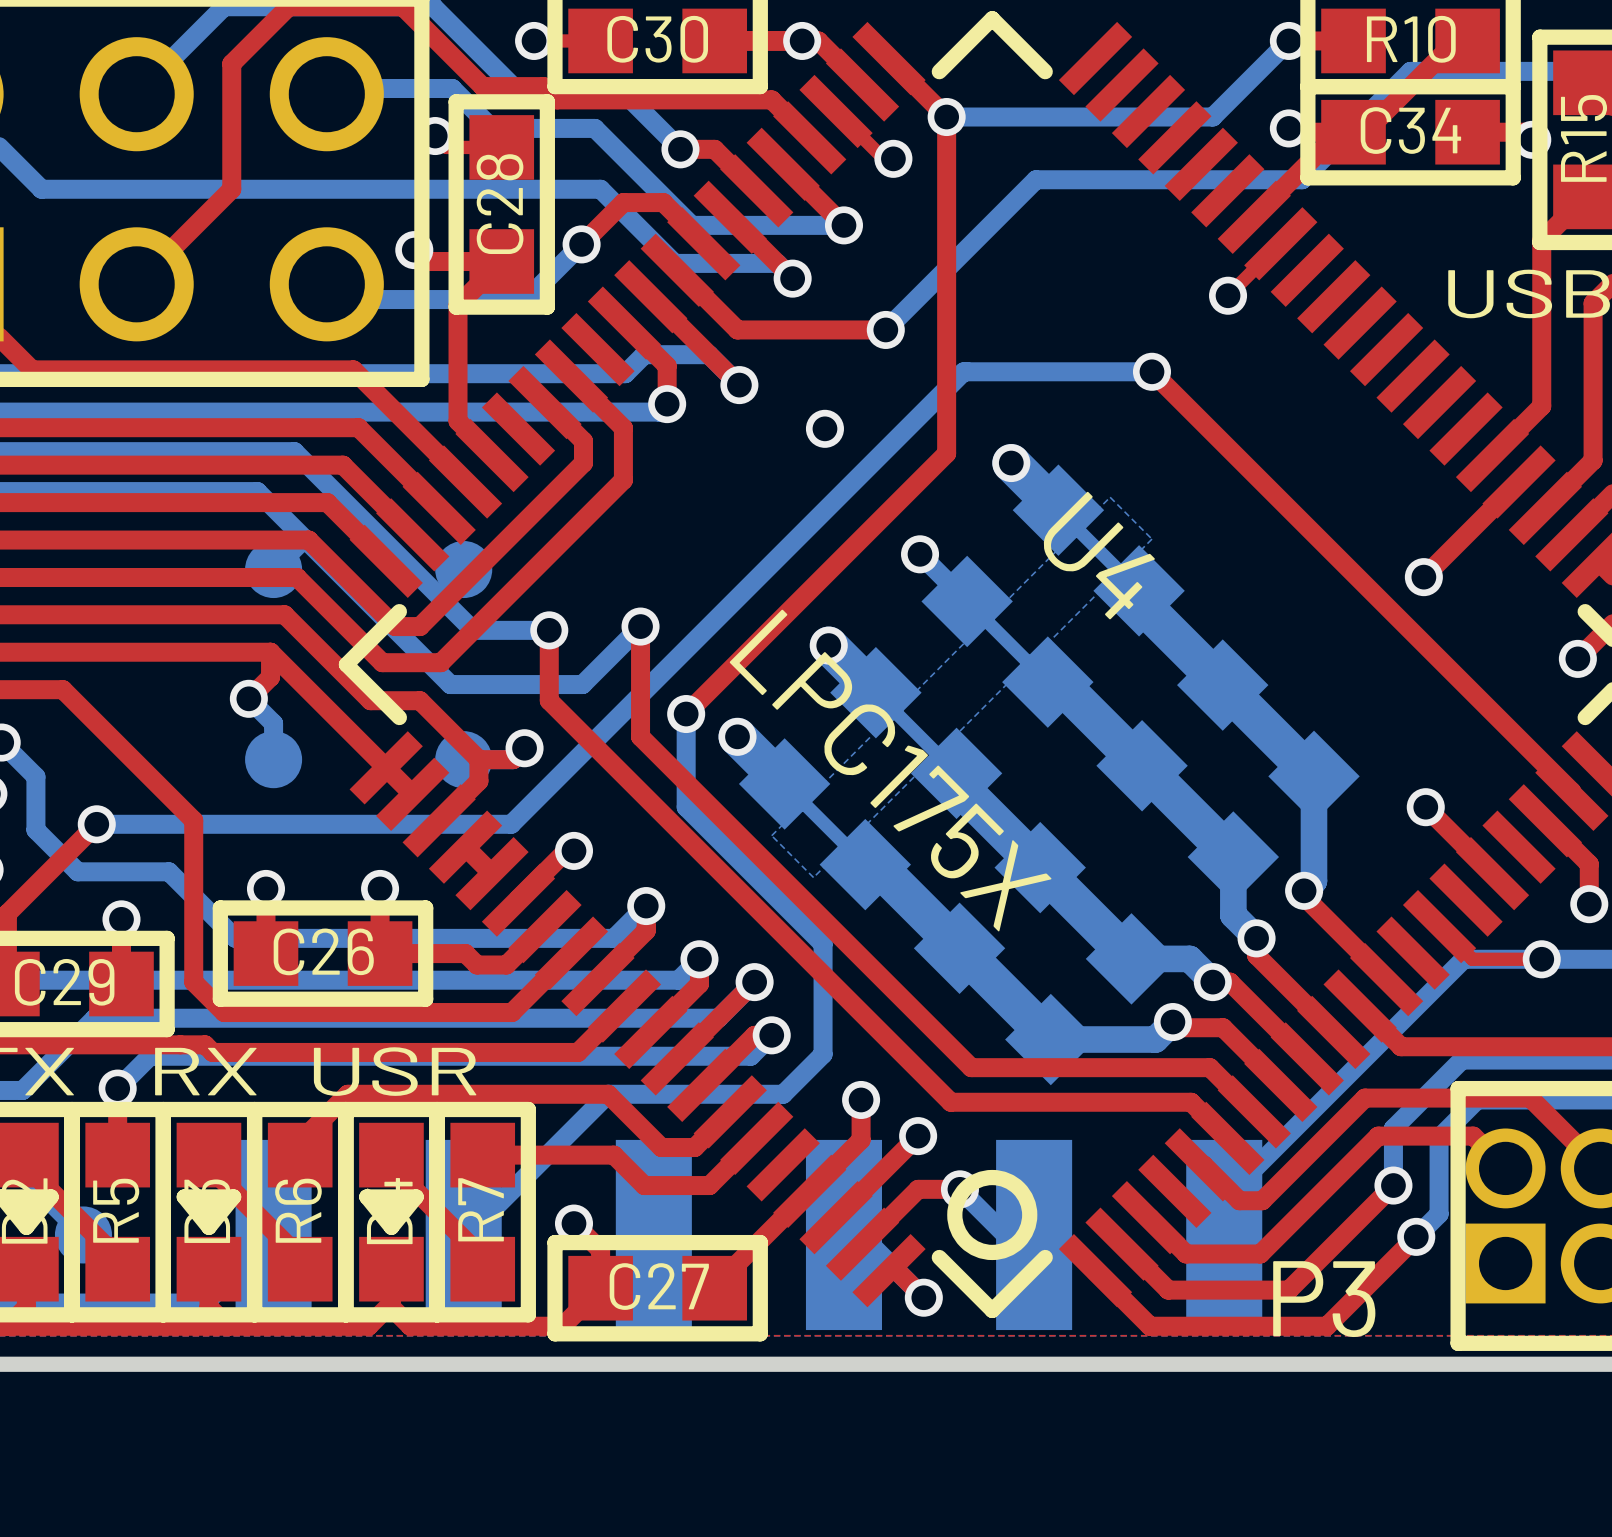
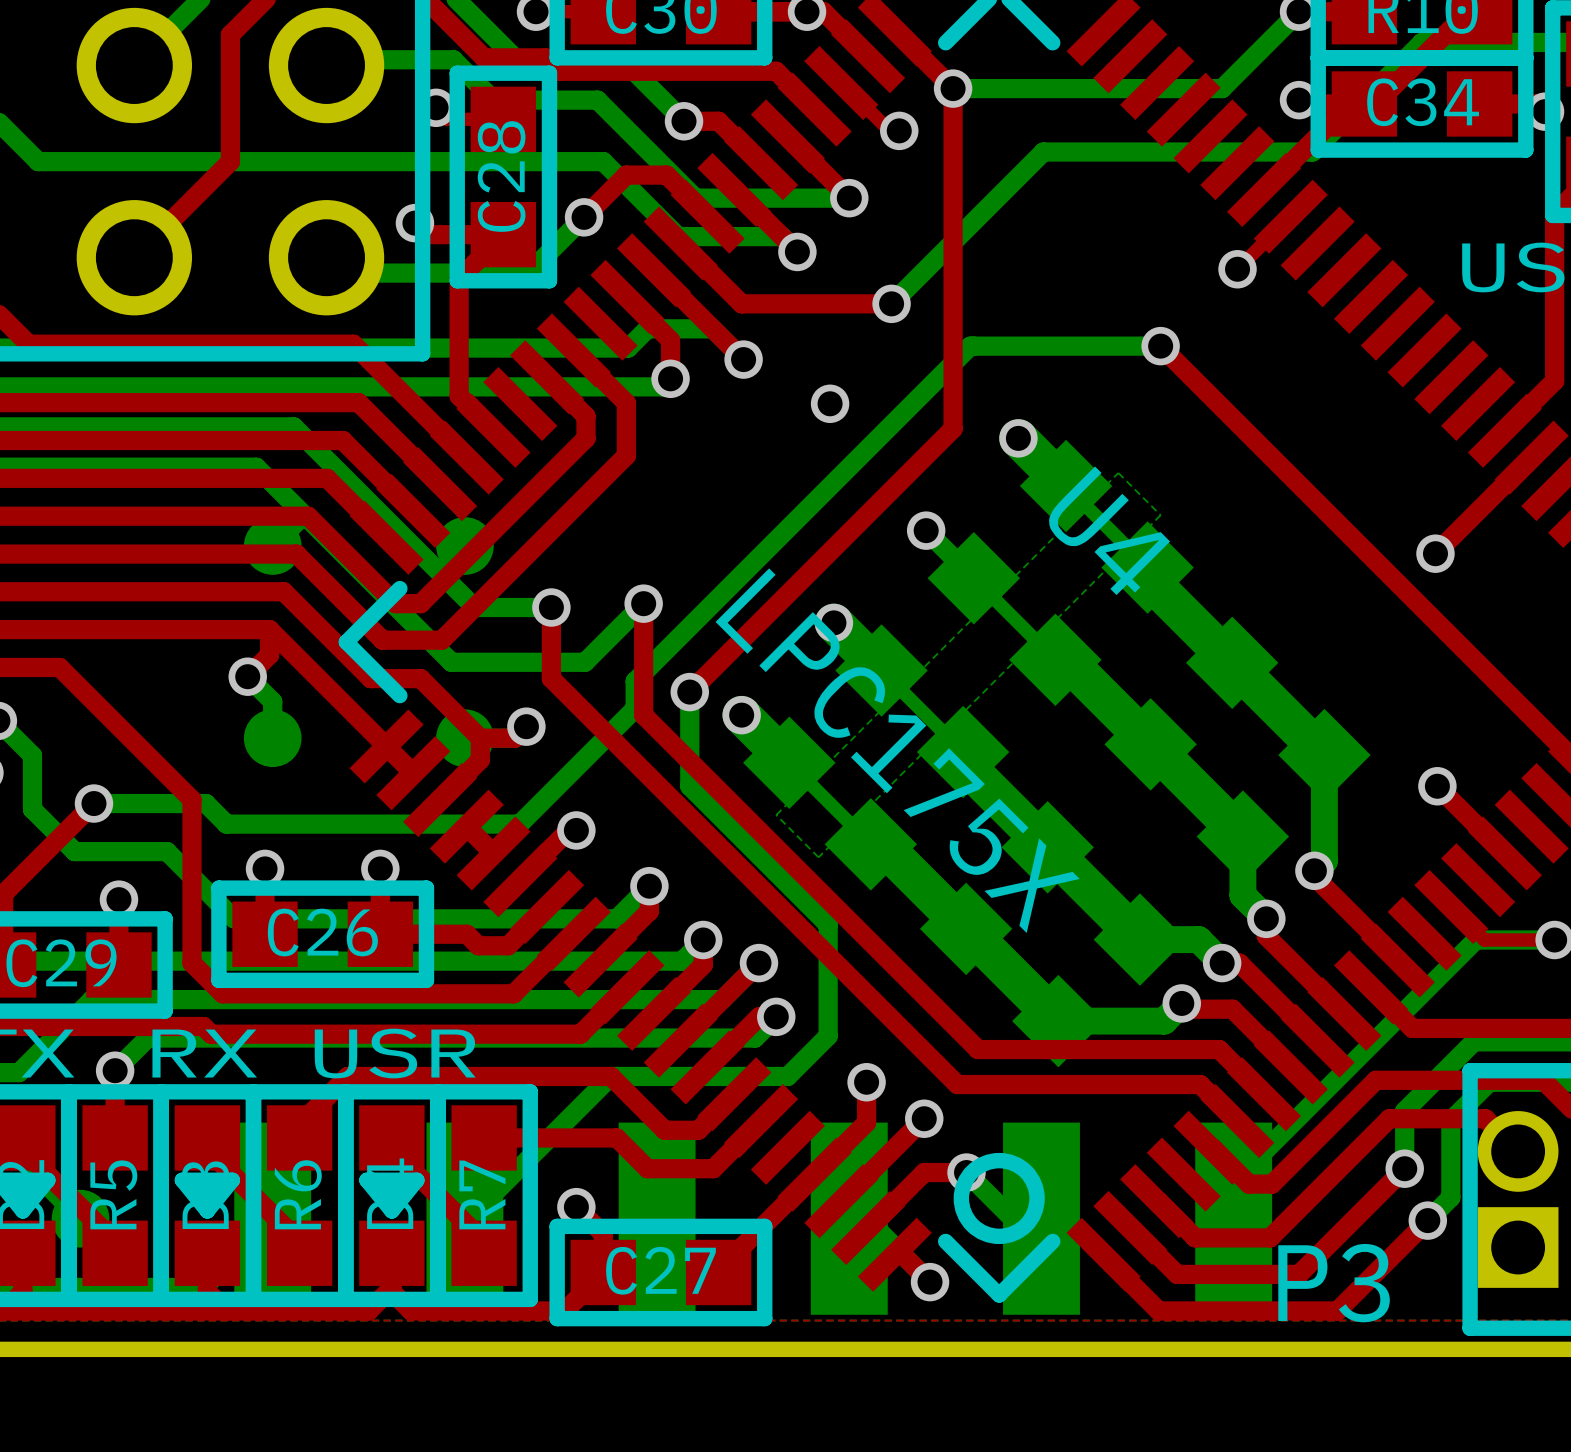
bottom track: (632, 703) (511, 824) (207, 824) -> (635, 681) (635, 708) (519, 824) (226, 824) (206, 803)

